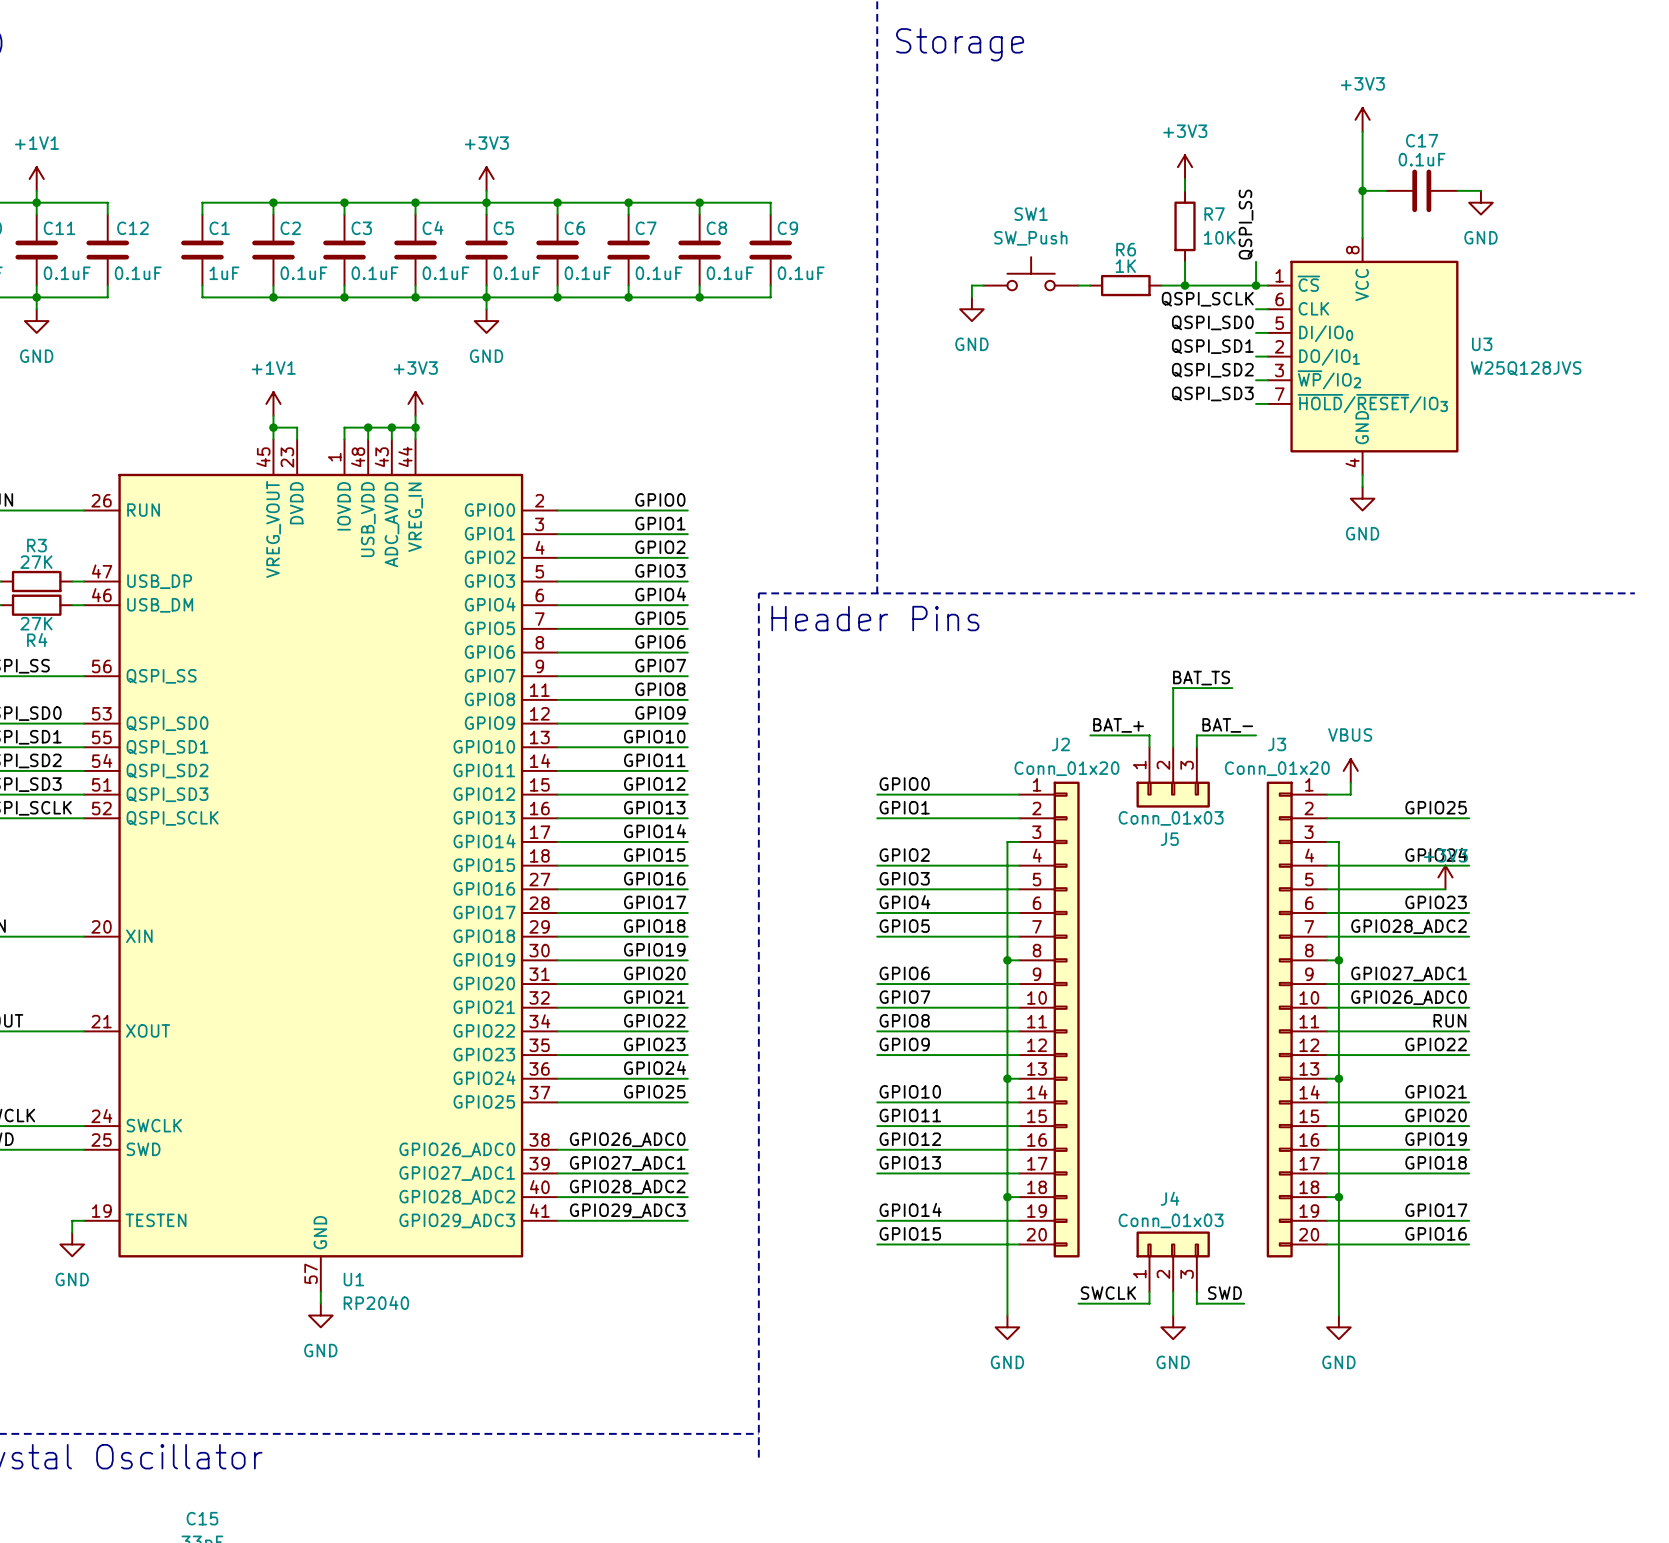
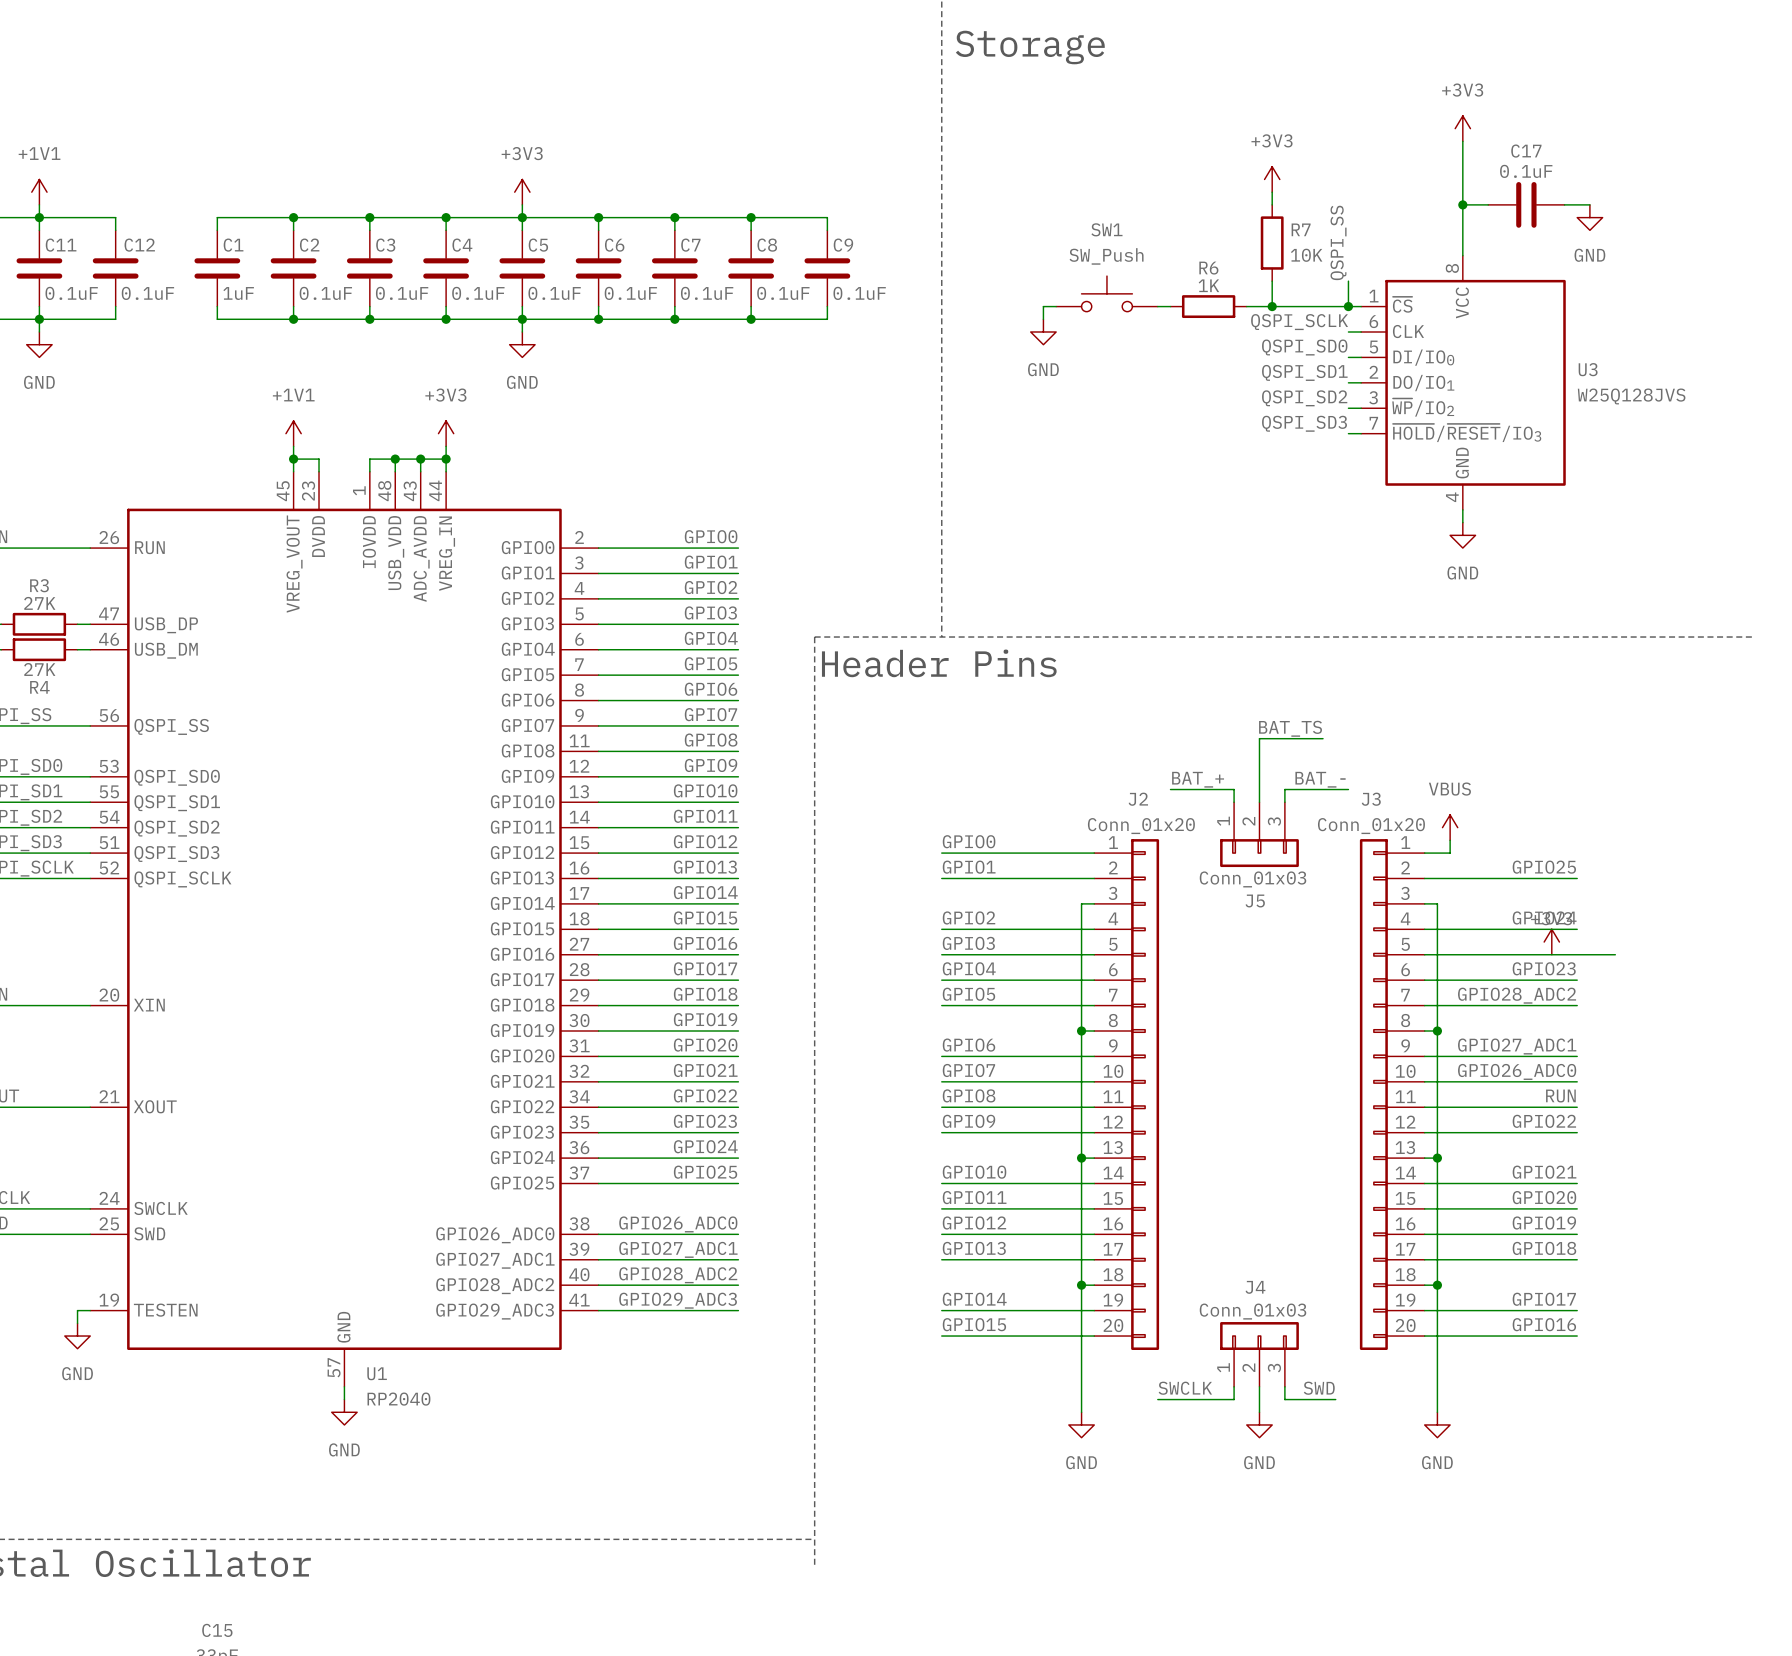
wire: none -> (1551, 954) (1615, 954)

